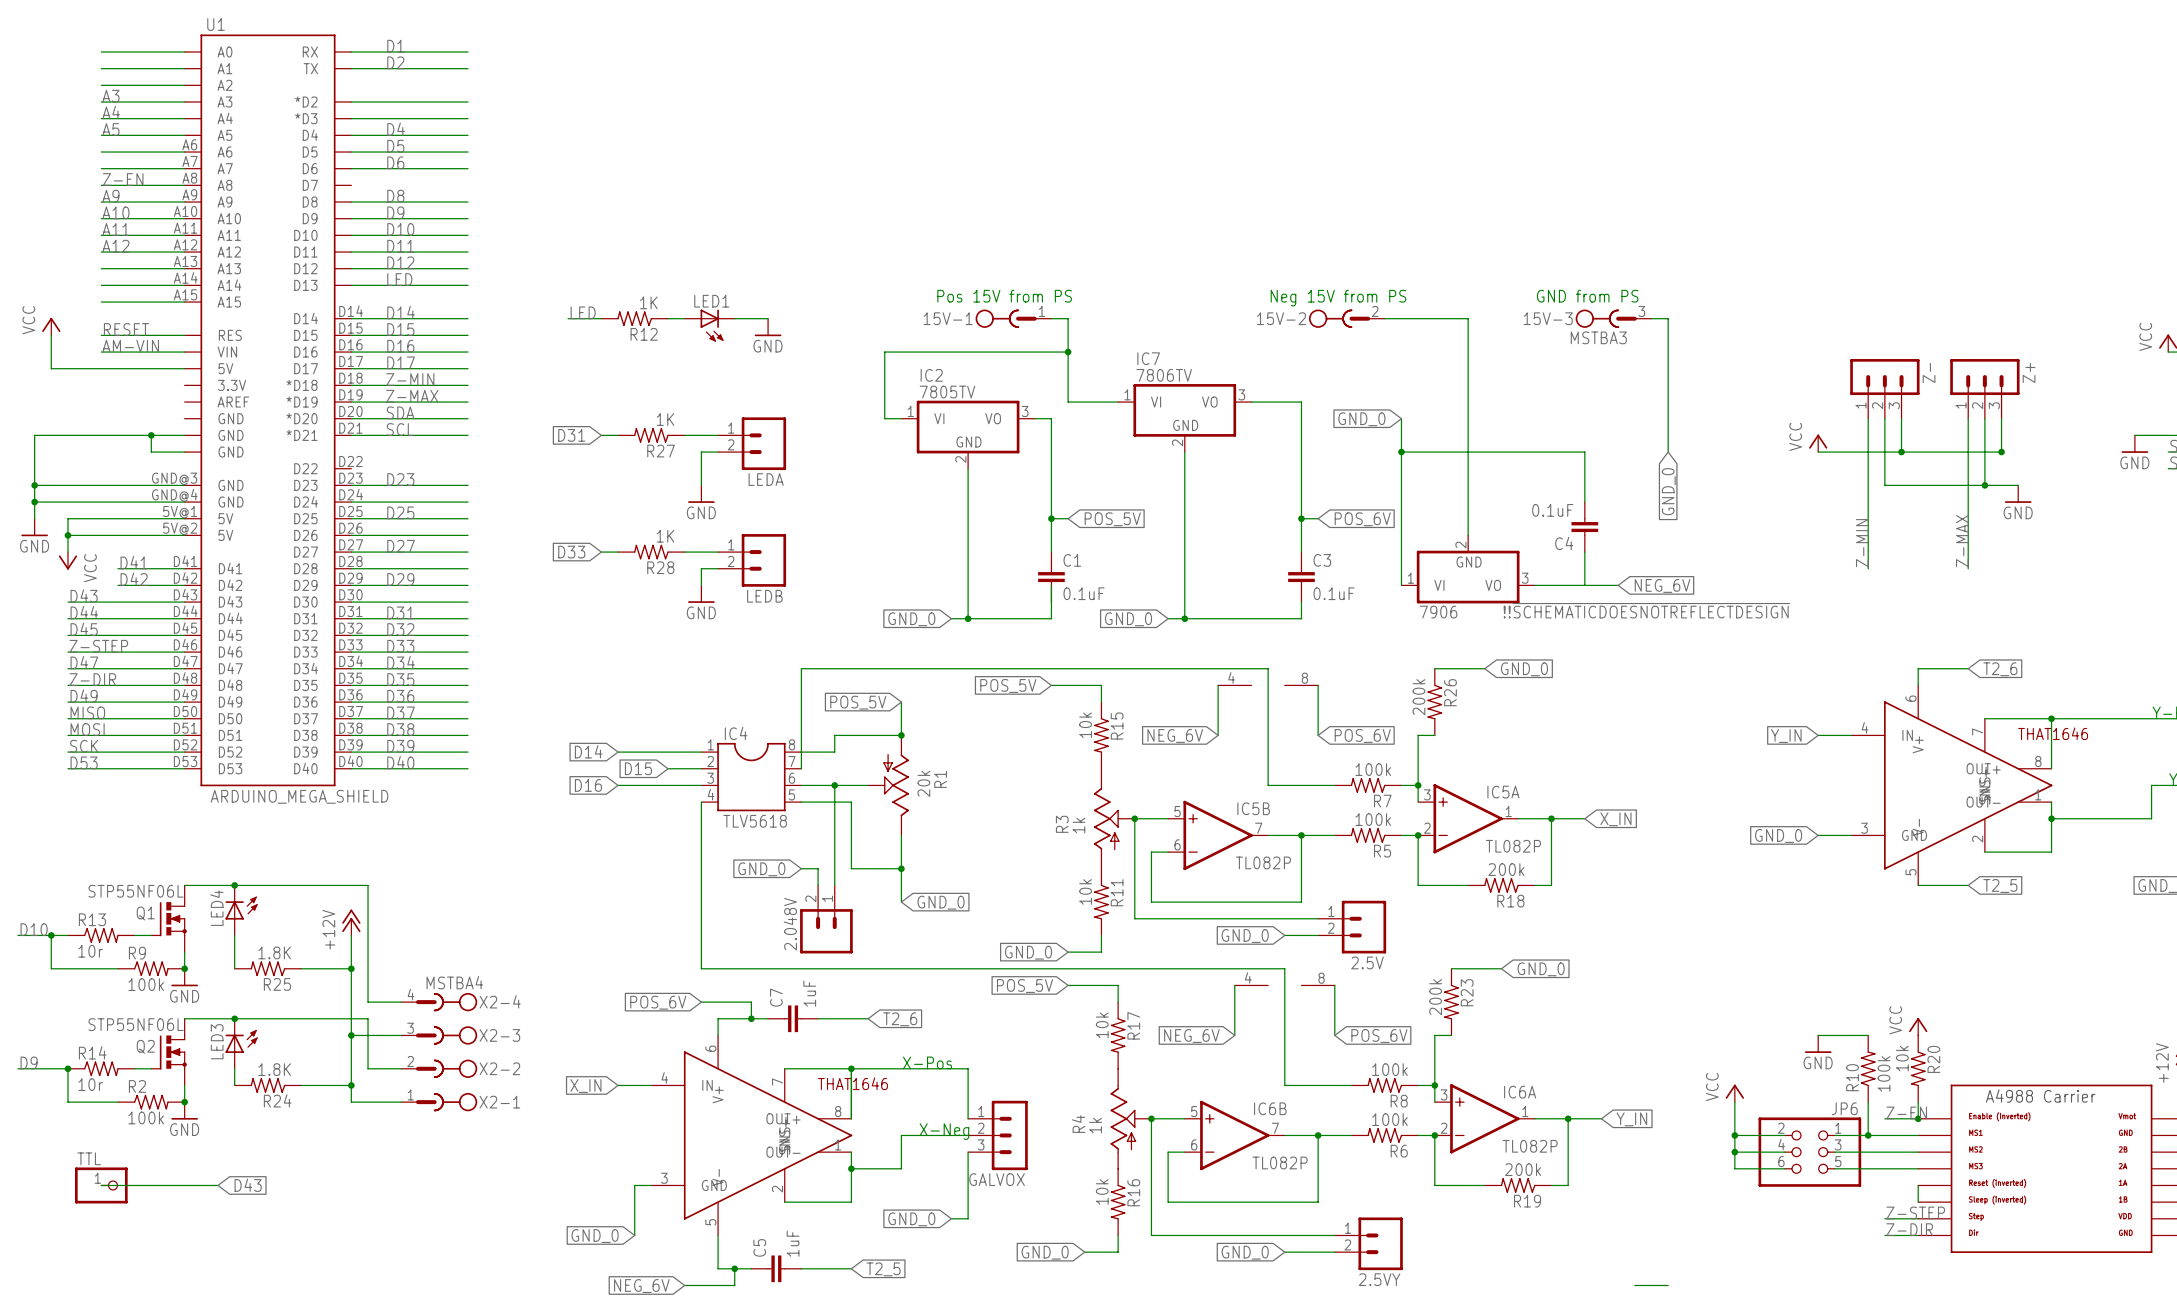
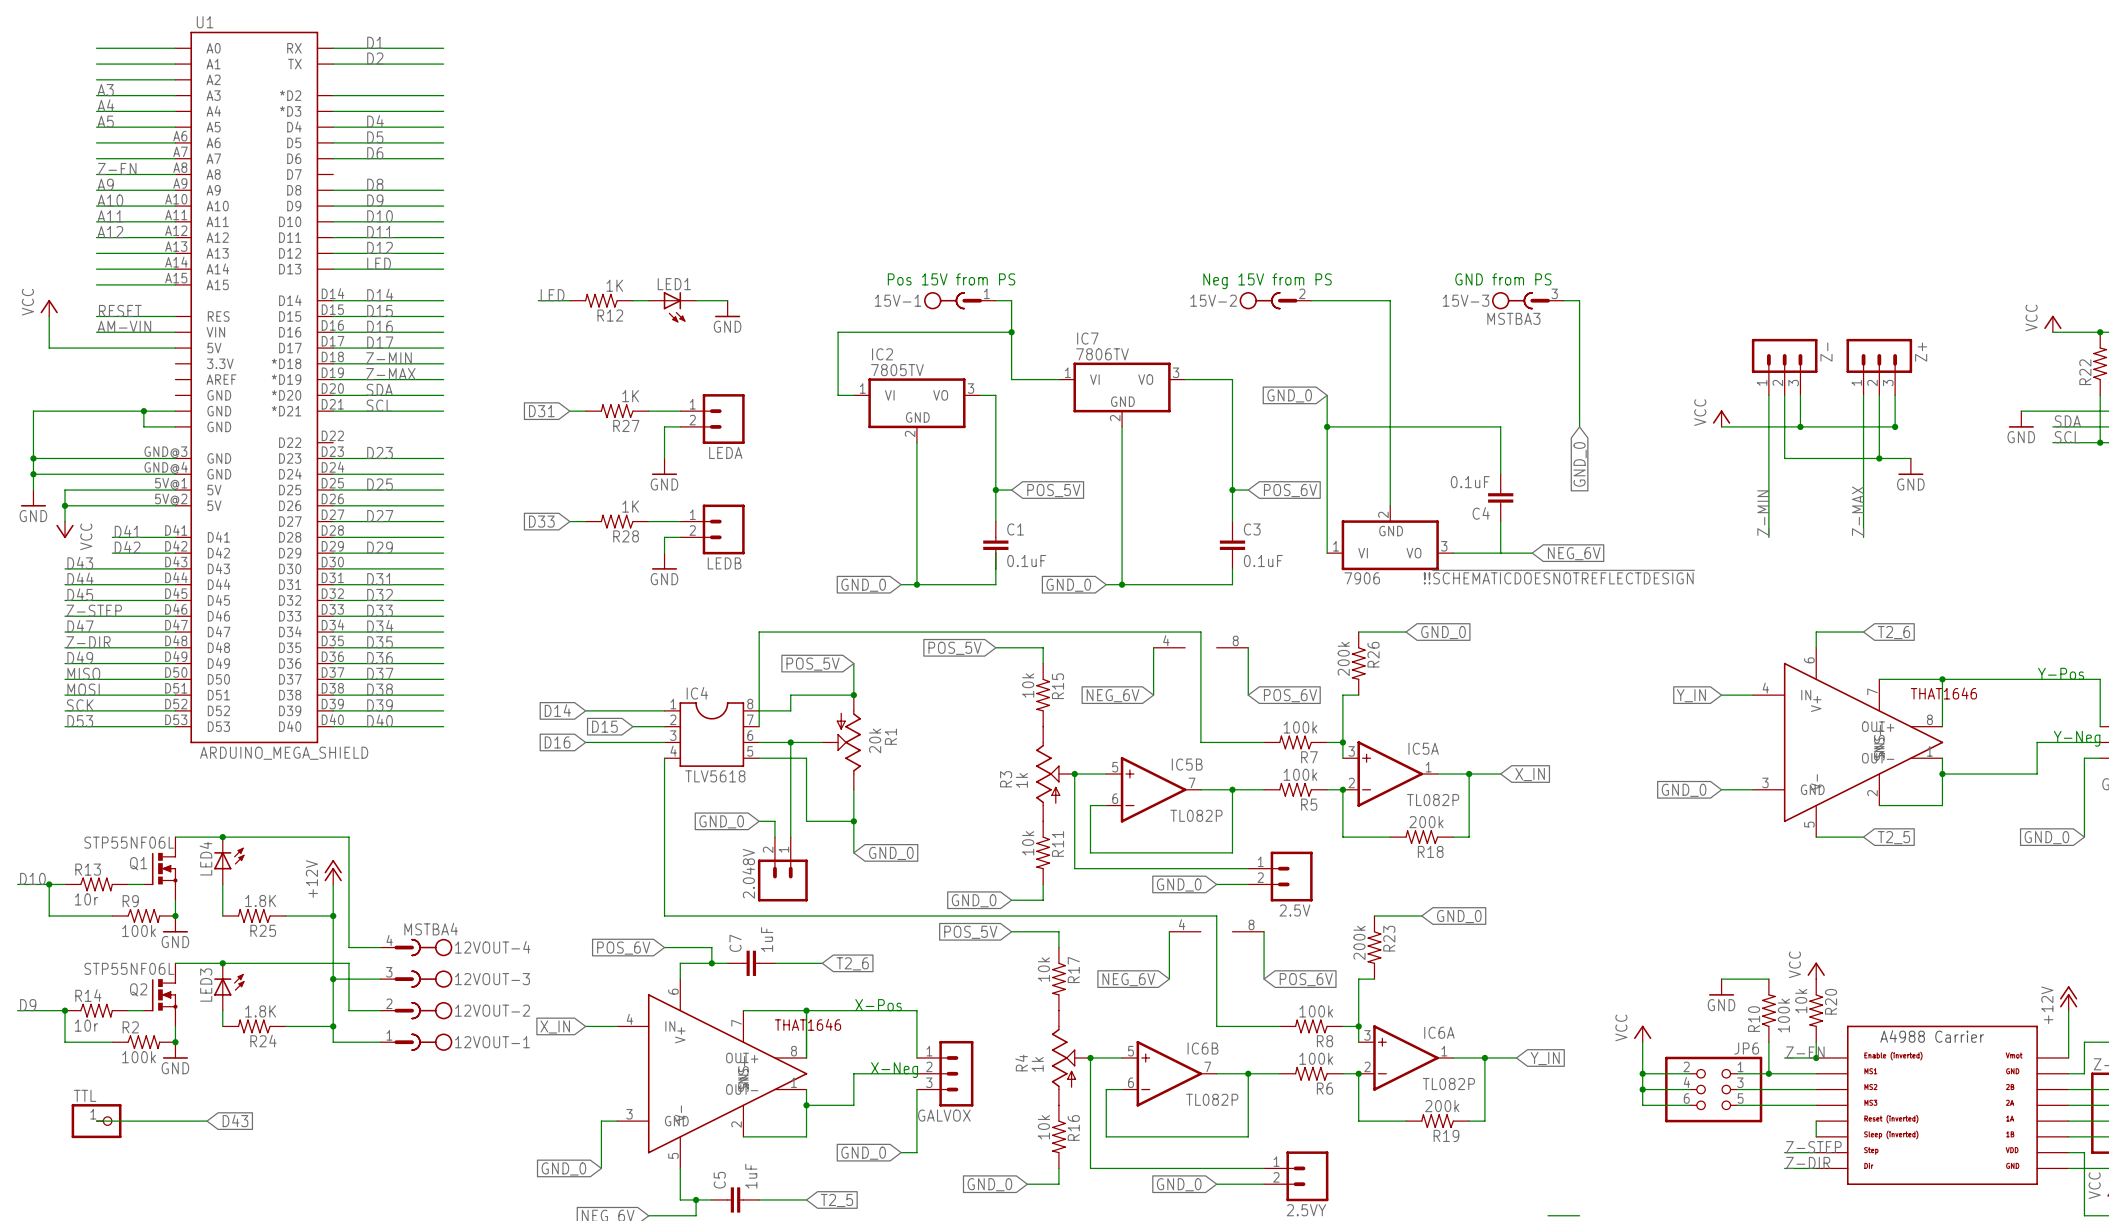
X2-4 name: X2-4 (500, 1001) -> 12VOUT-4 (492, 947)
X2-3 name: X2-3 (499, 1035) -> 12VOUT-3 (492, 979)
X2-2 name: X2-2 (499, 1068) -> 12VOUT-2 (492, 1010)
X2-1 name: X2-1 (499, 1102) -> 12VOUT-1 (492, 1042)

